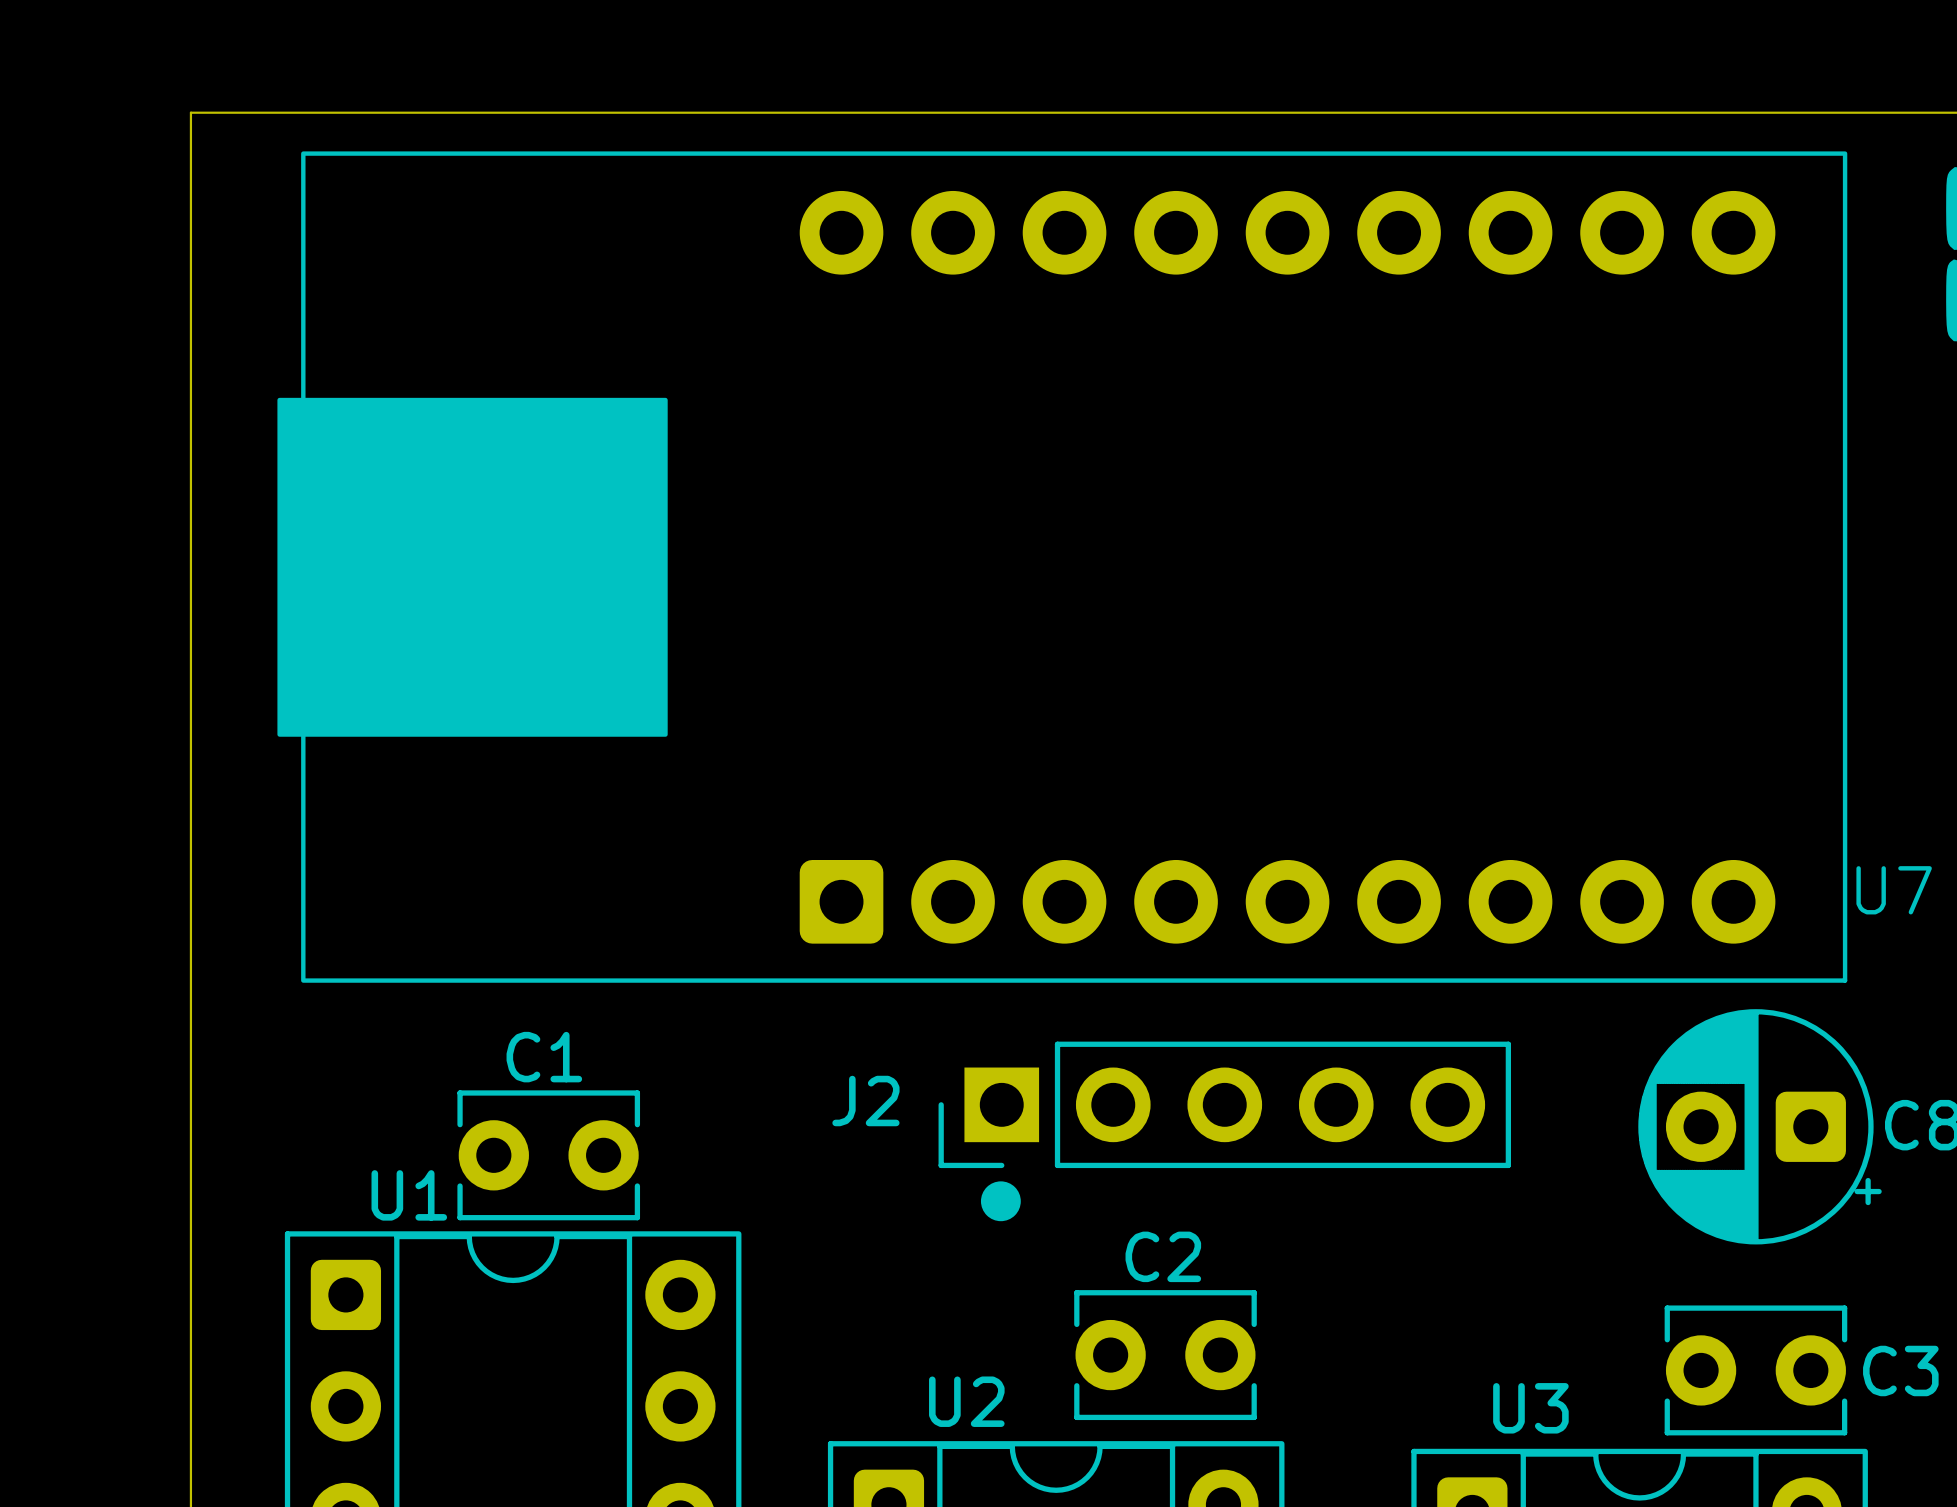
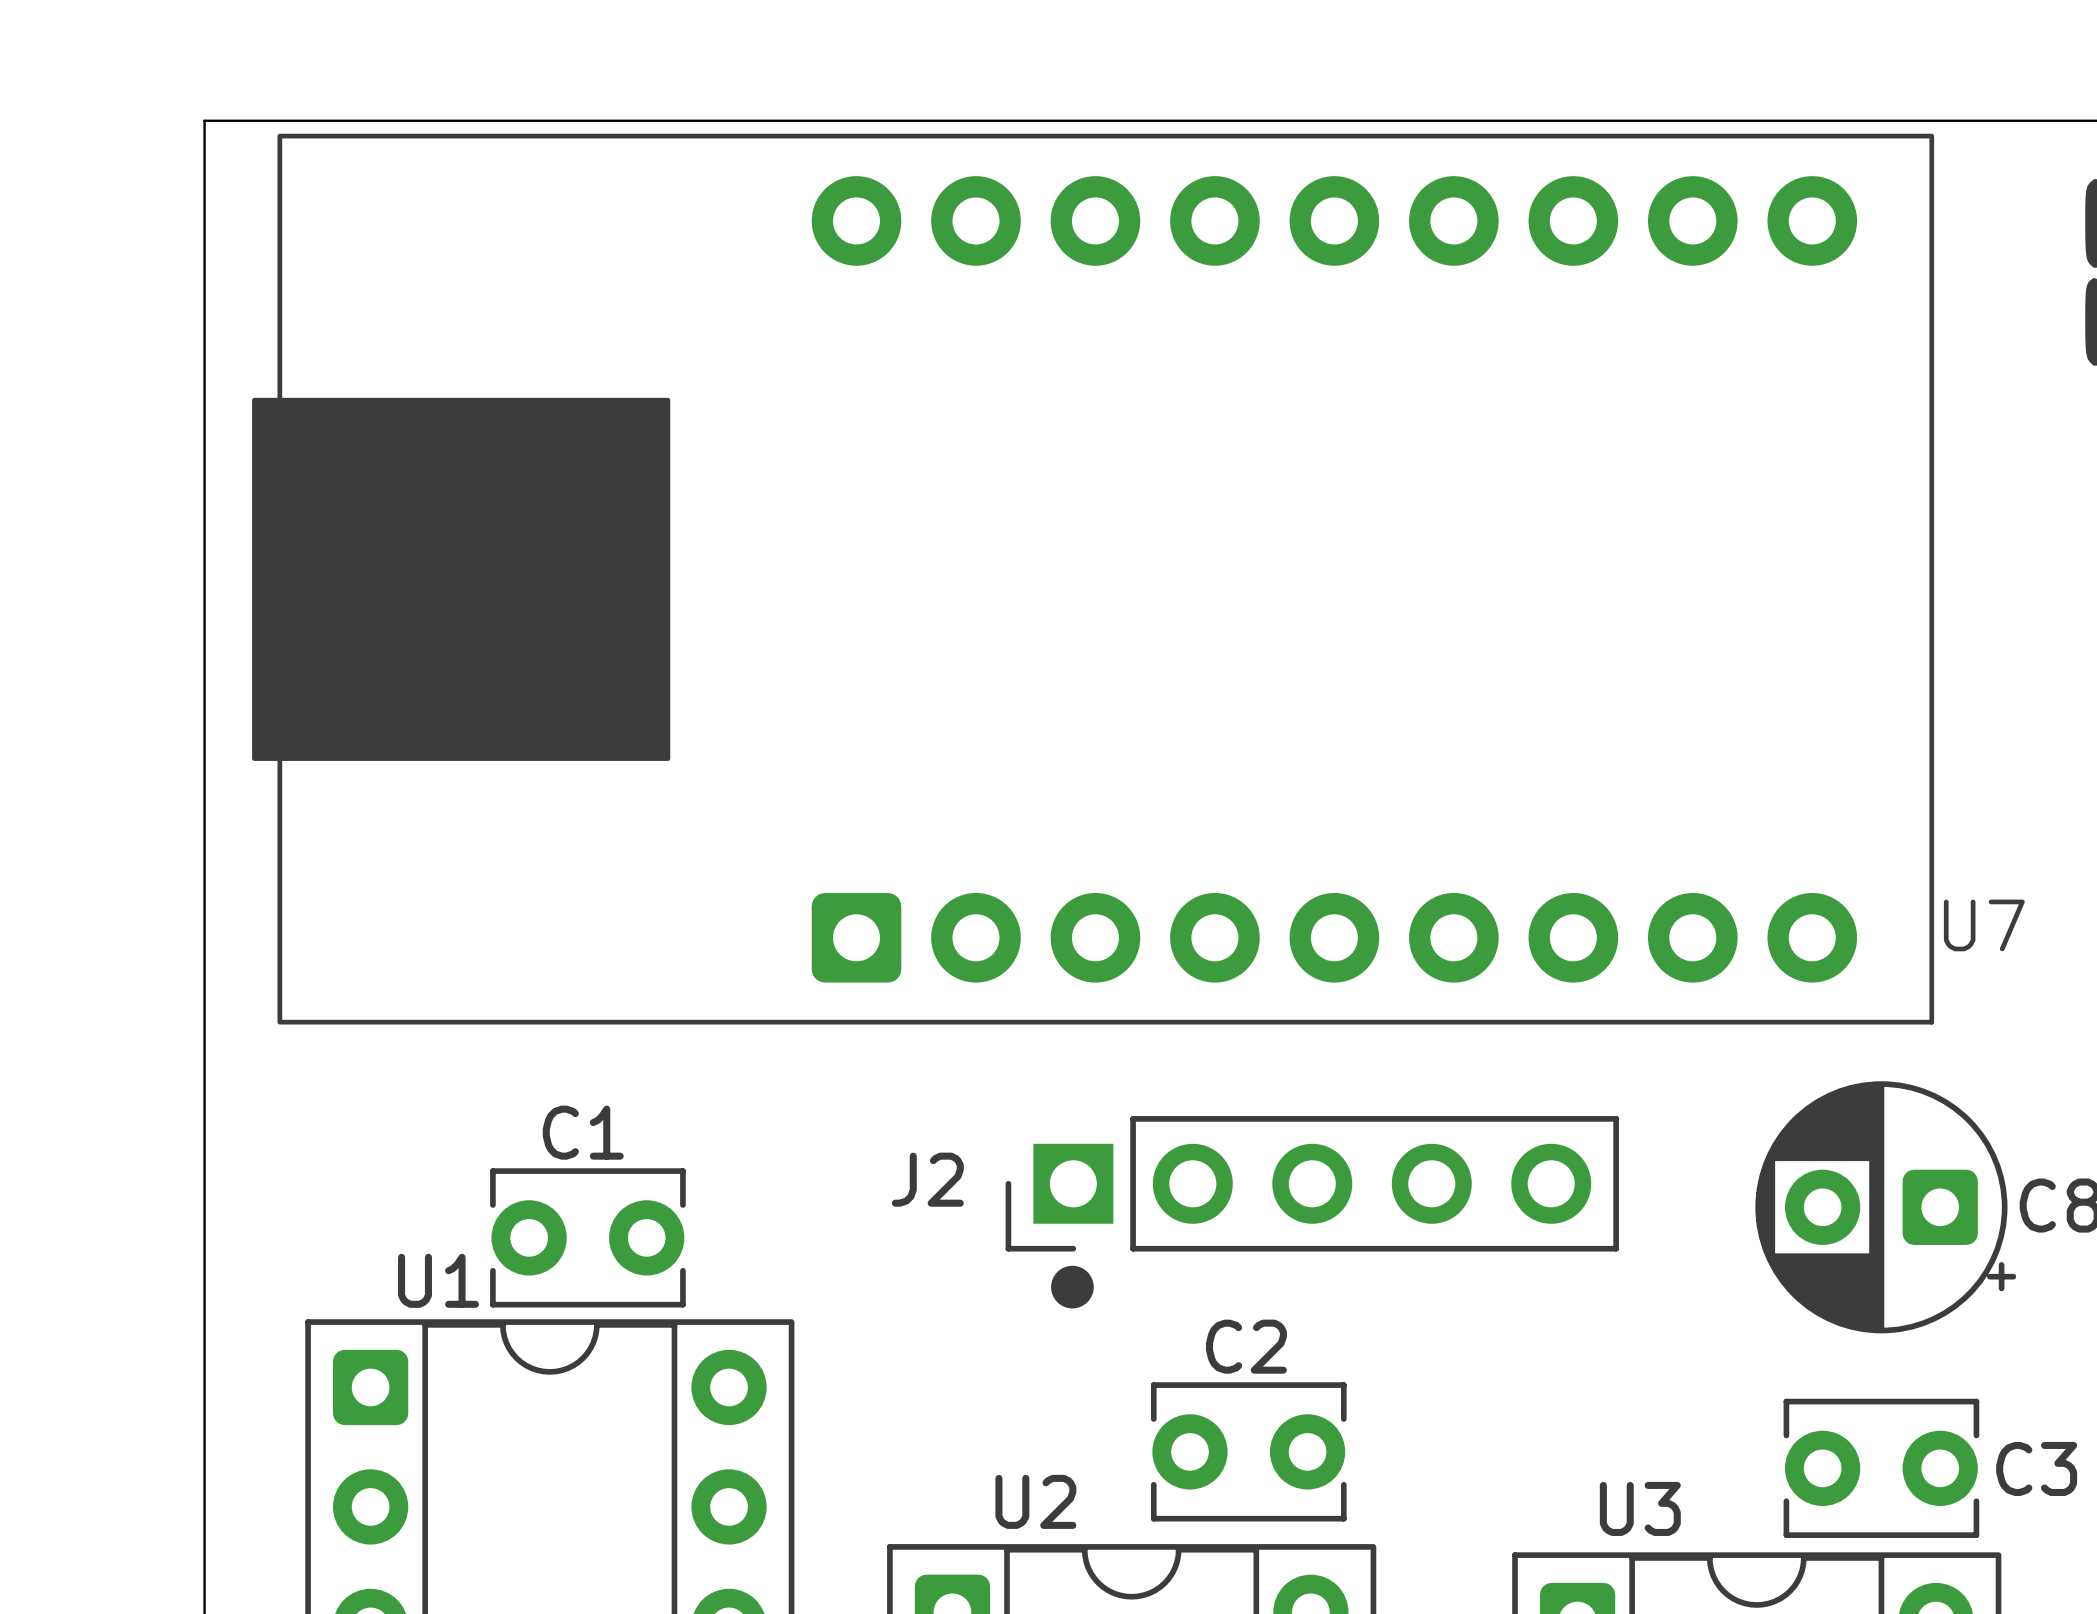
U7 position: (1062, 567) -> (1093, 579)

